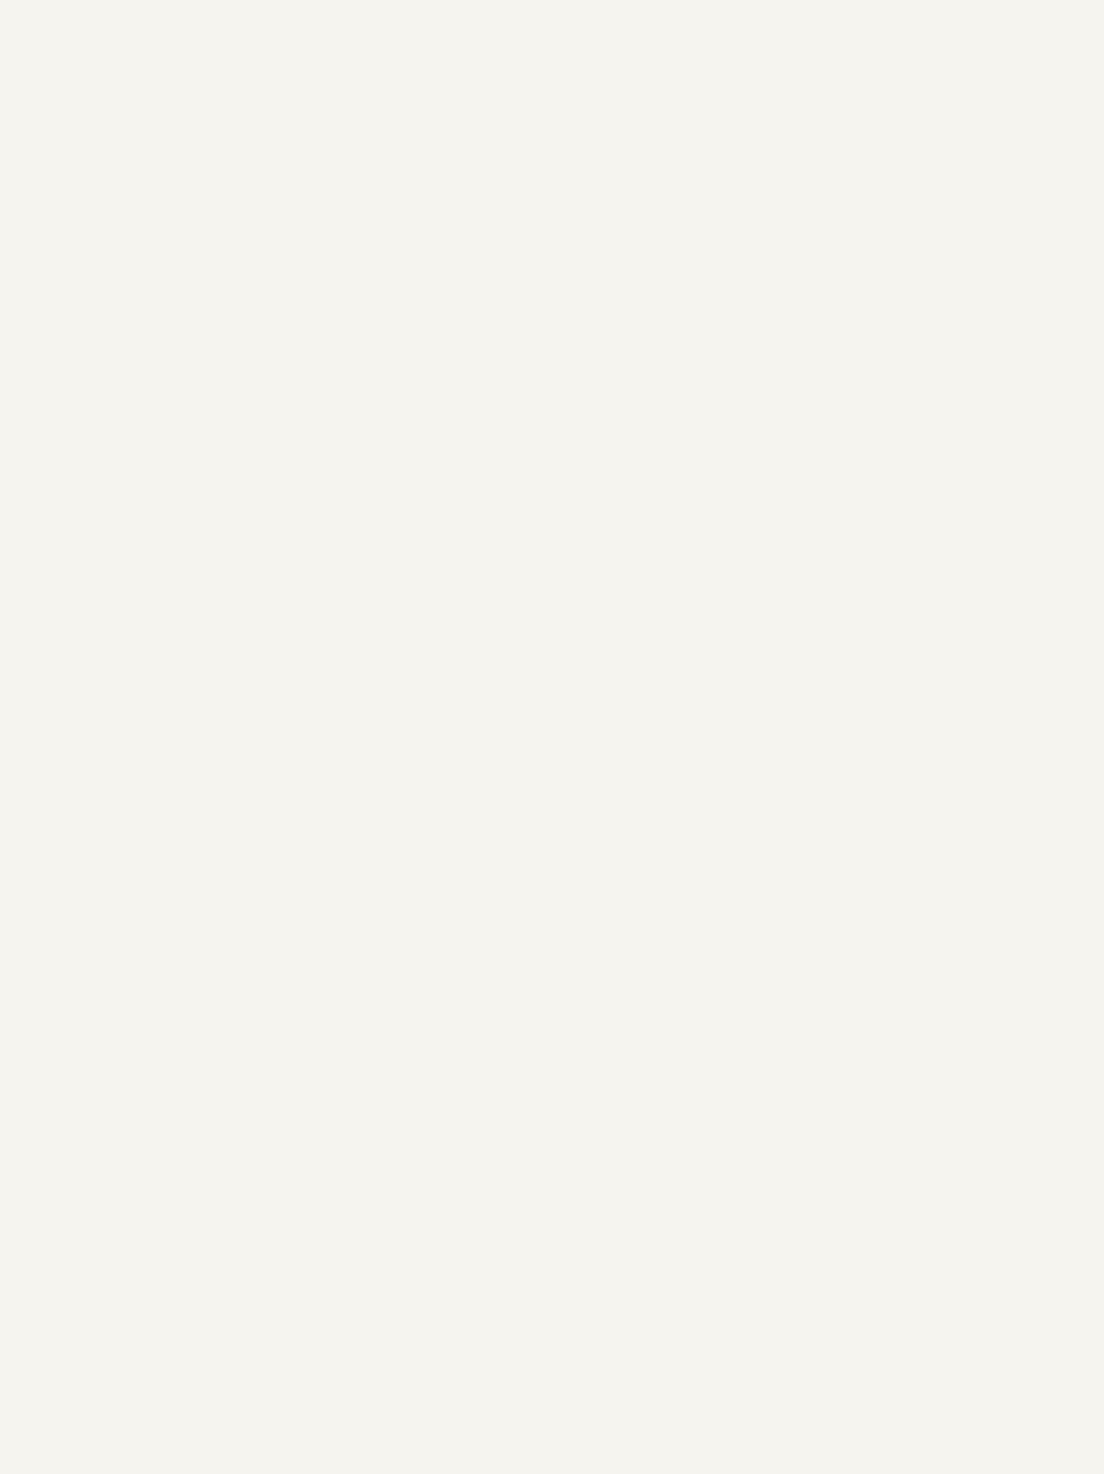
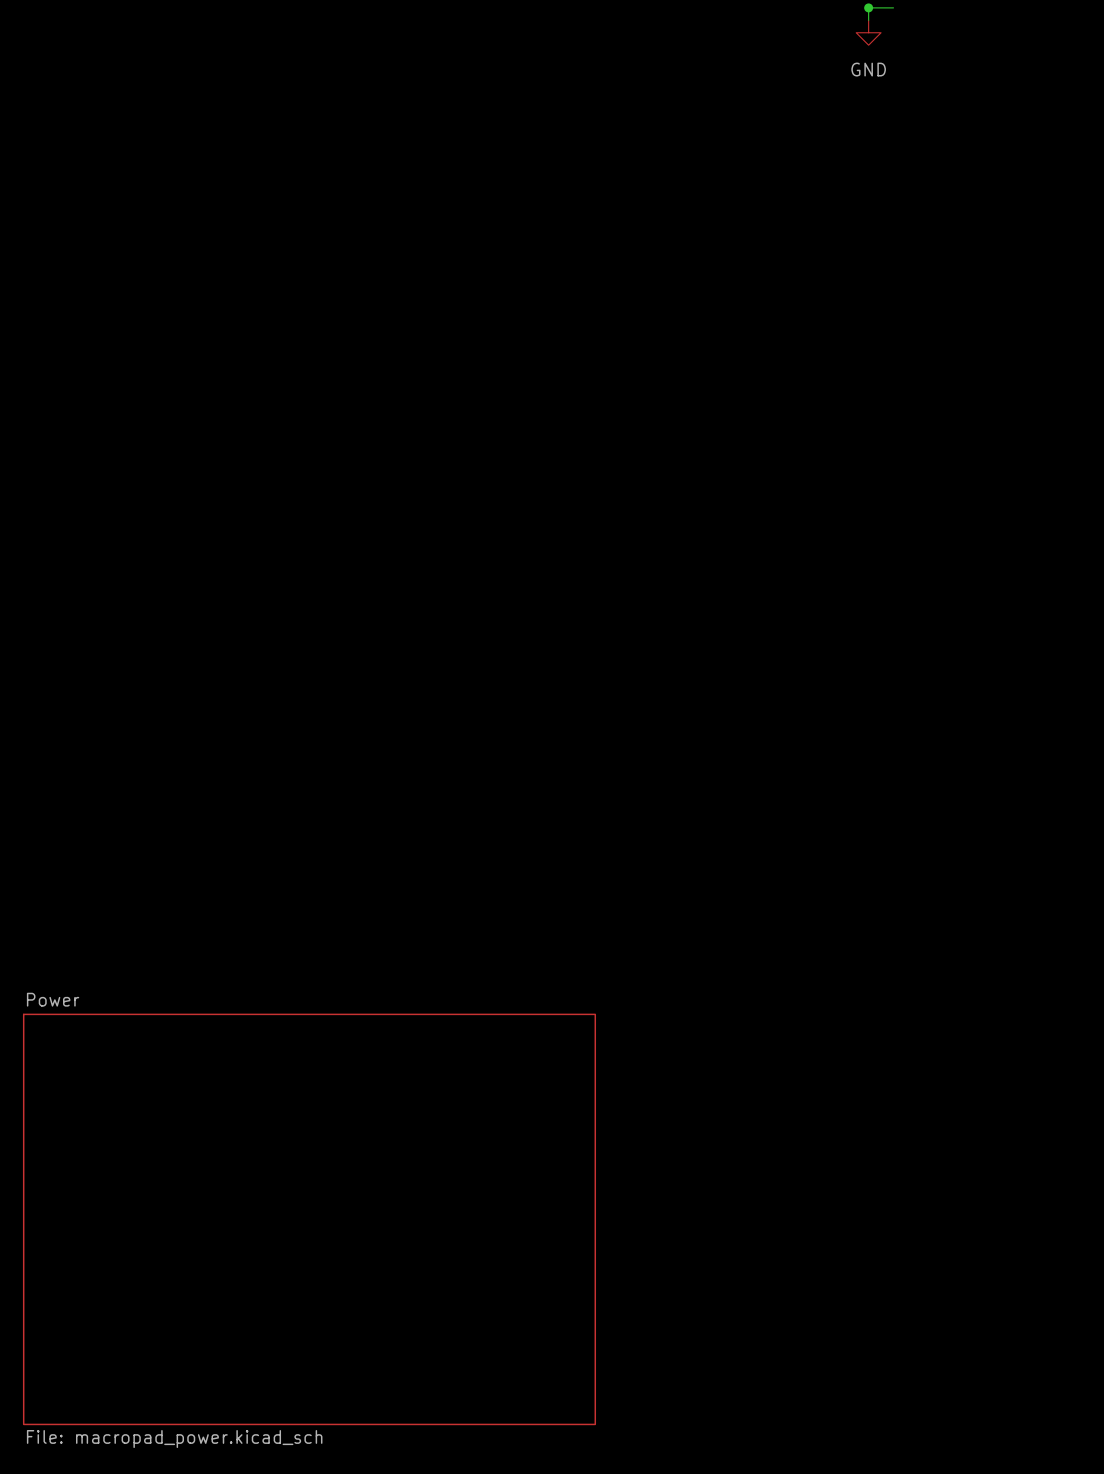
junction: none -> (868, 7)
wire: none -> (893, 7) (868, 7) (868, 20)
power symbol: none -> GND (868, 32)
sheet Power: none -> File: macropad_power.kicad_sch (309, 1219)

